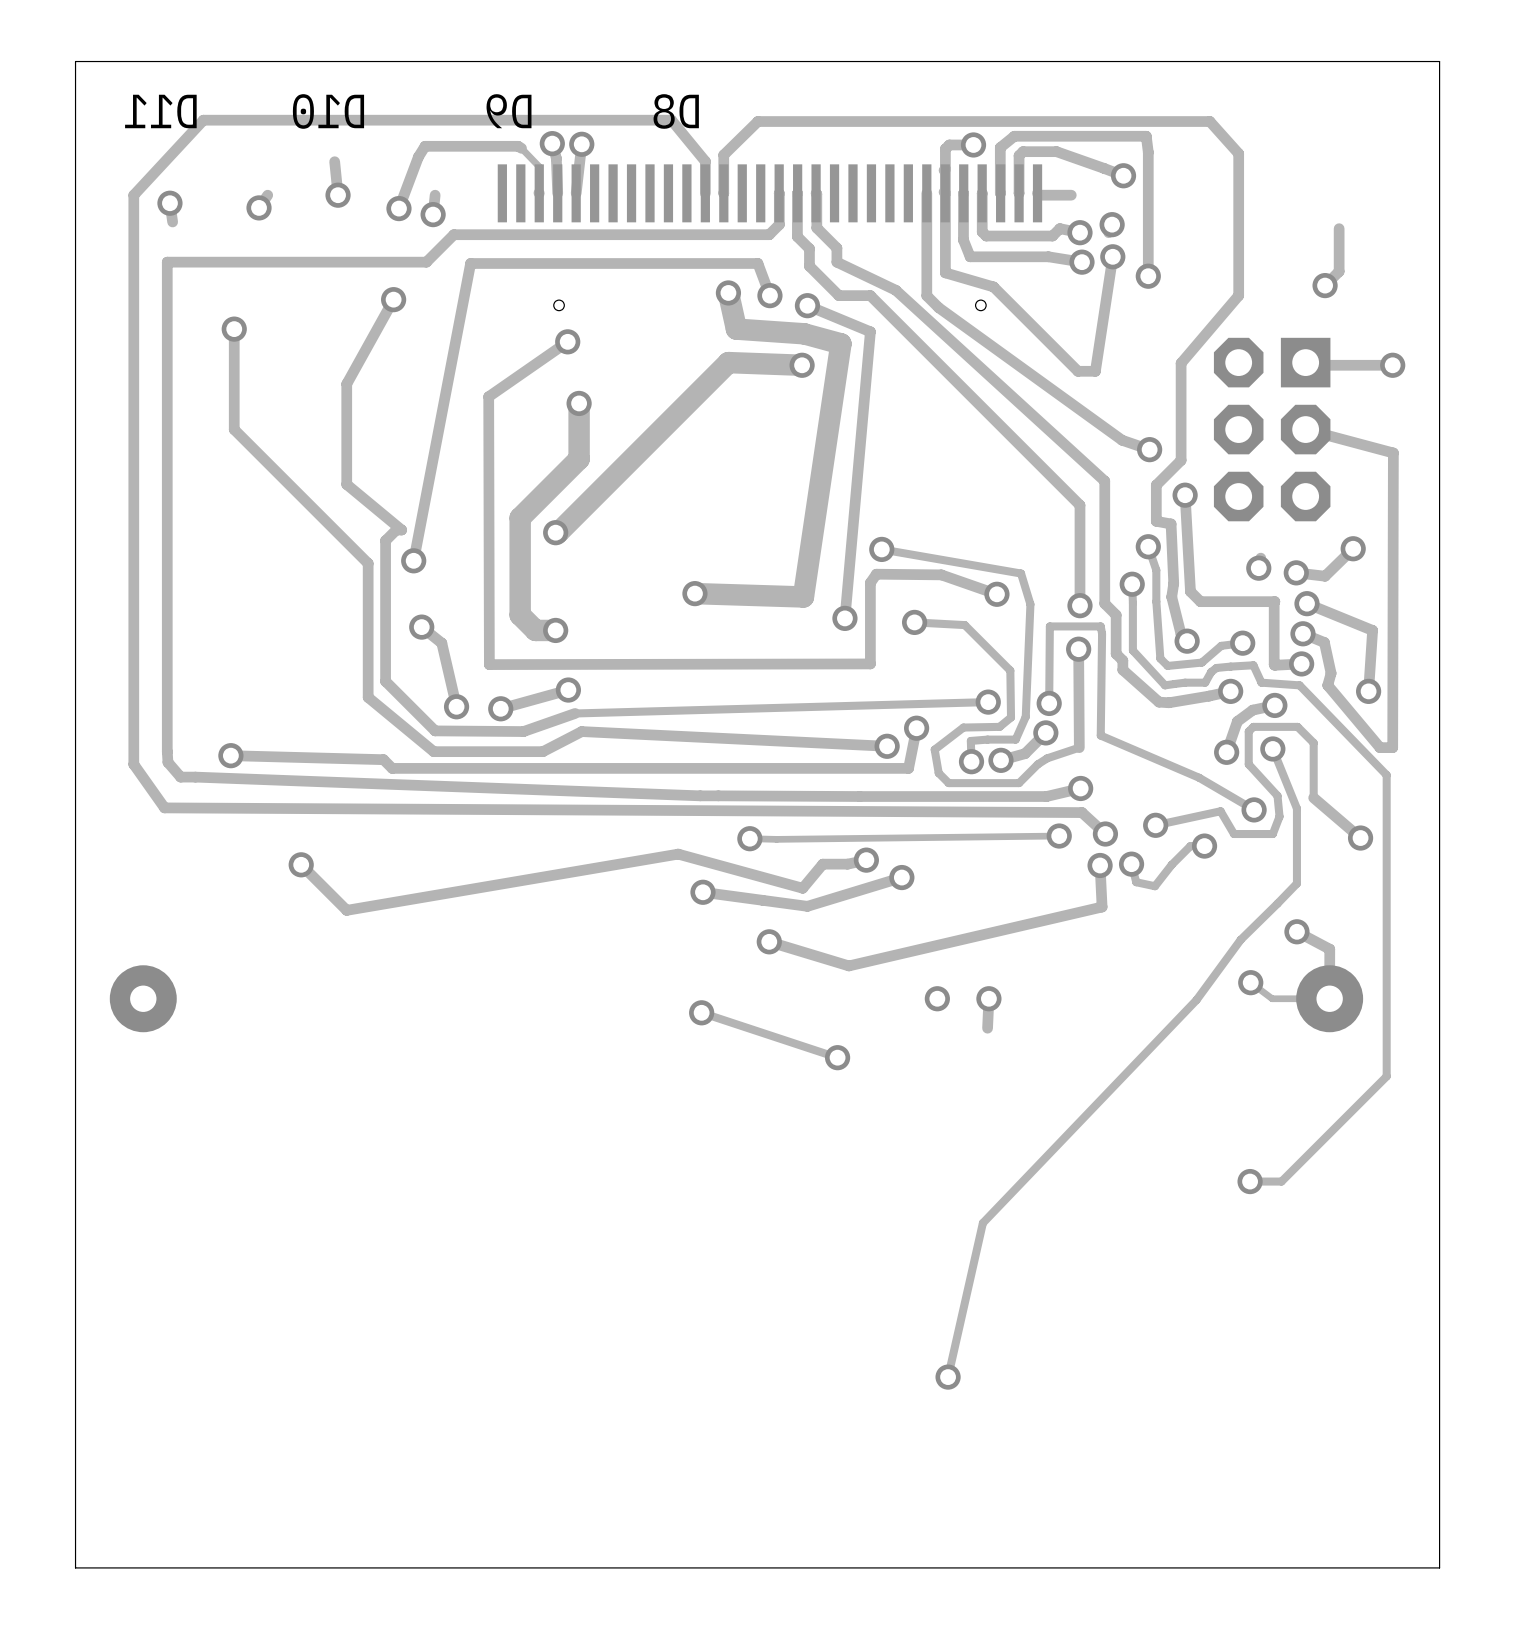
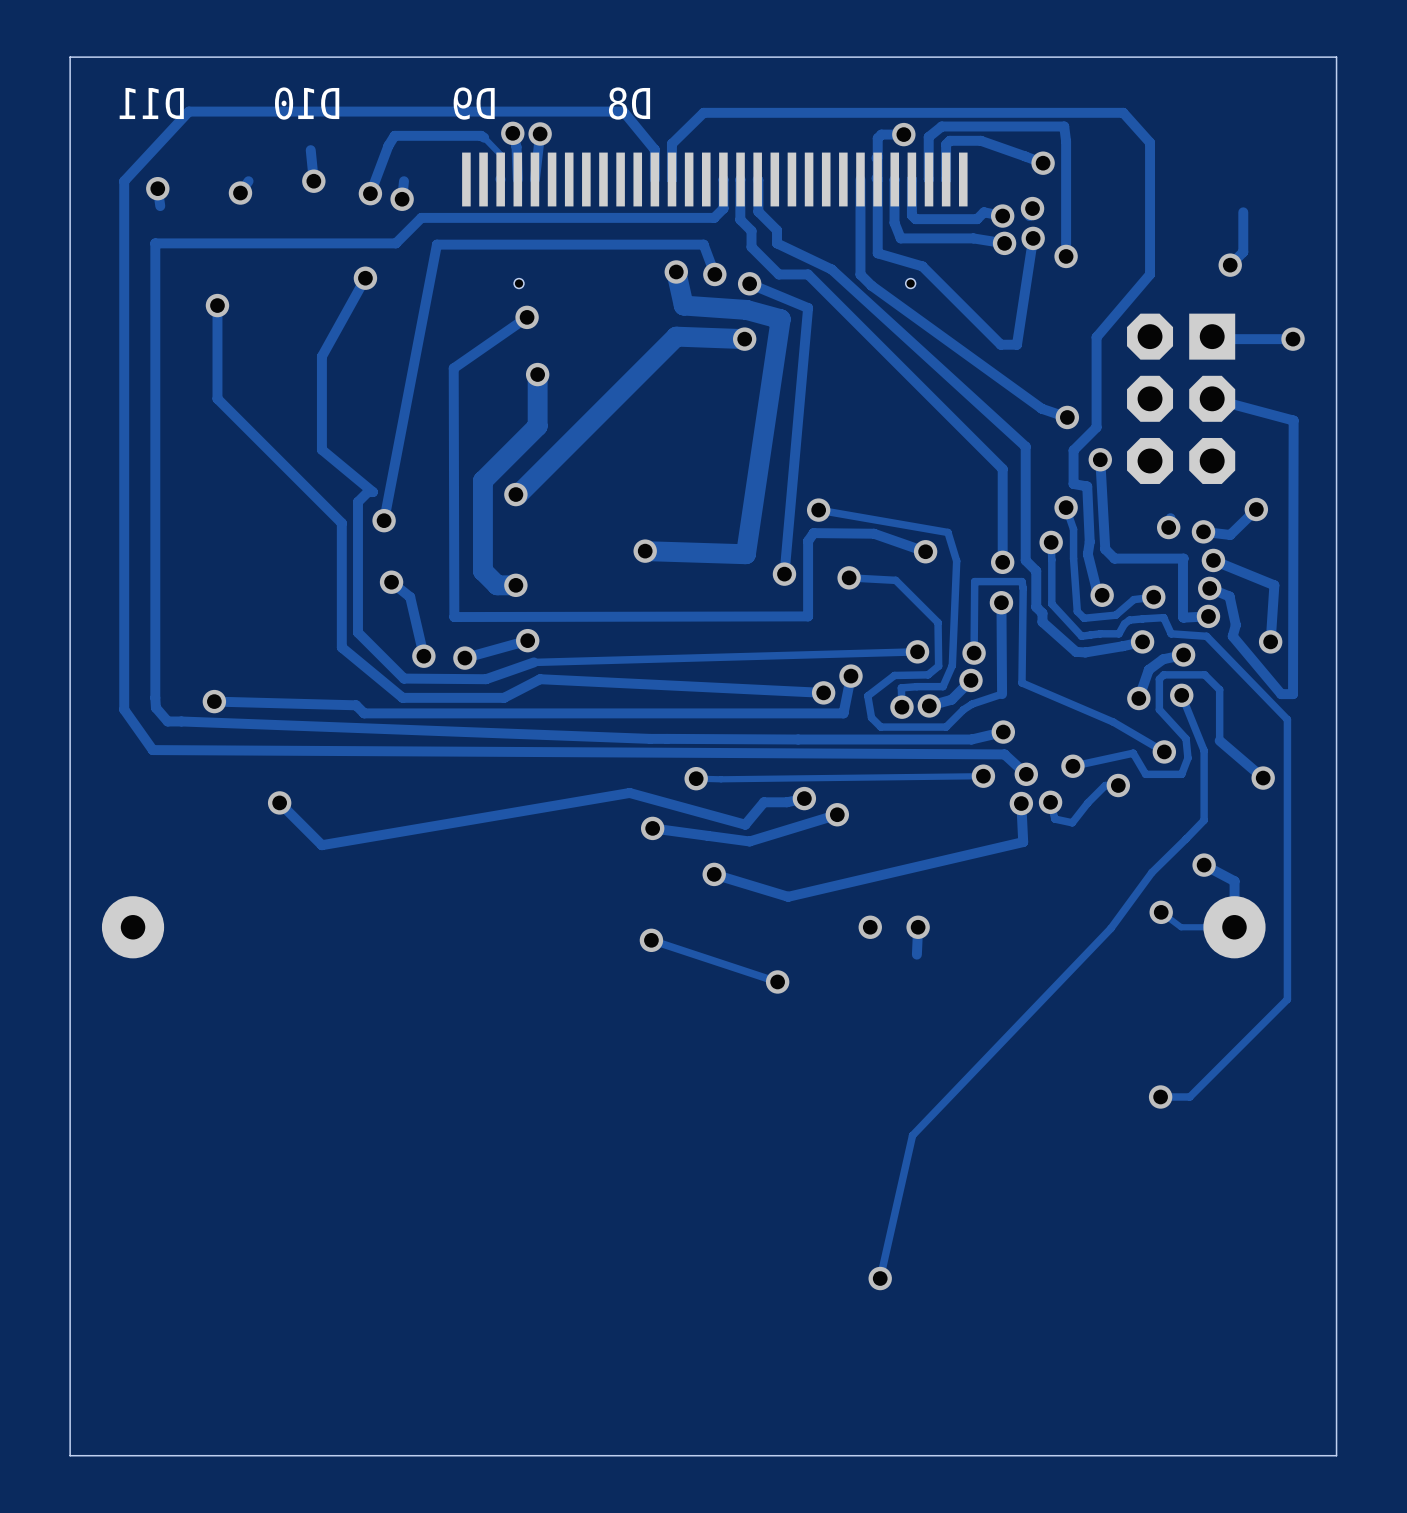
track: (1037, 193) (1039, 195) (1071, 195) -> none

